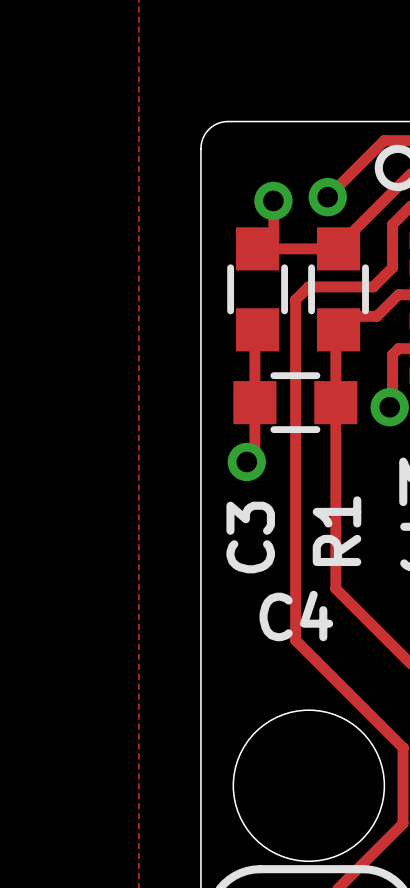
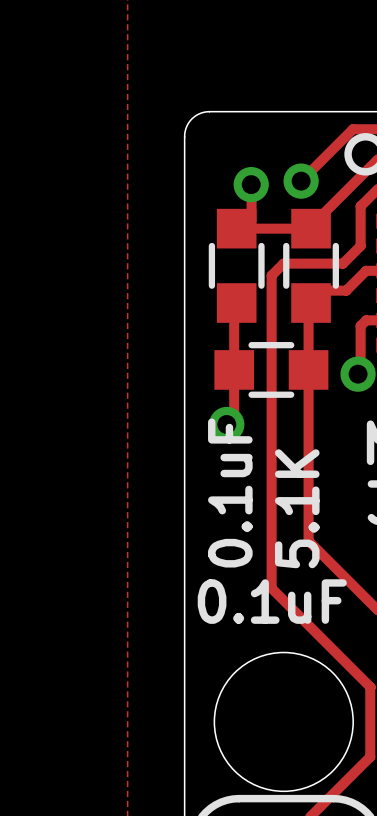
R1 name: R1 (337, 531) -> none
C3 value: none -> 0.1uF (230, 492)
C3 name: C3 (250, 537) -> none
R1 value: none -> 5.1K (297, 508)
C4 name: C4 (296, 615) -> none
C4 value: none -> 0.1uF (272, 601)

